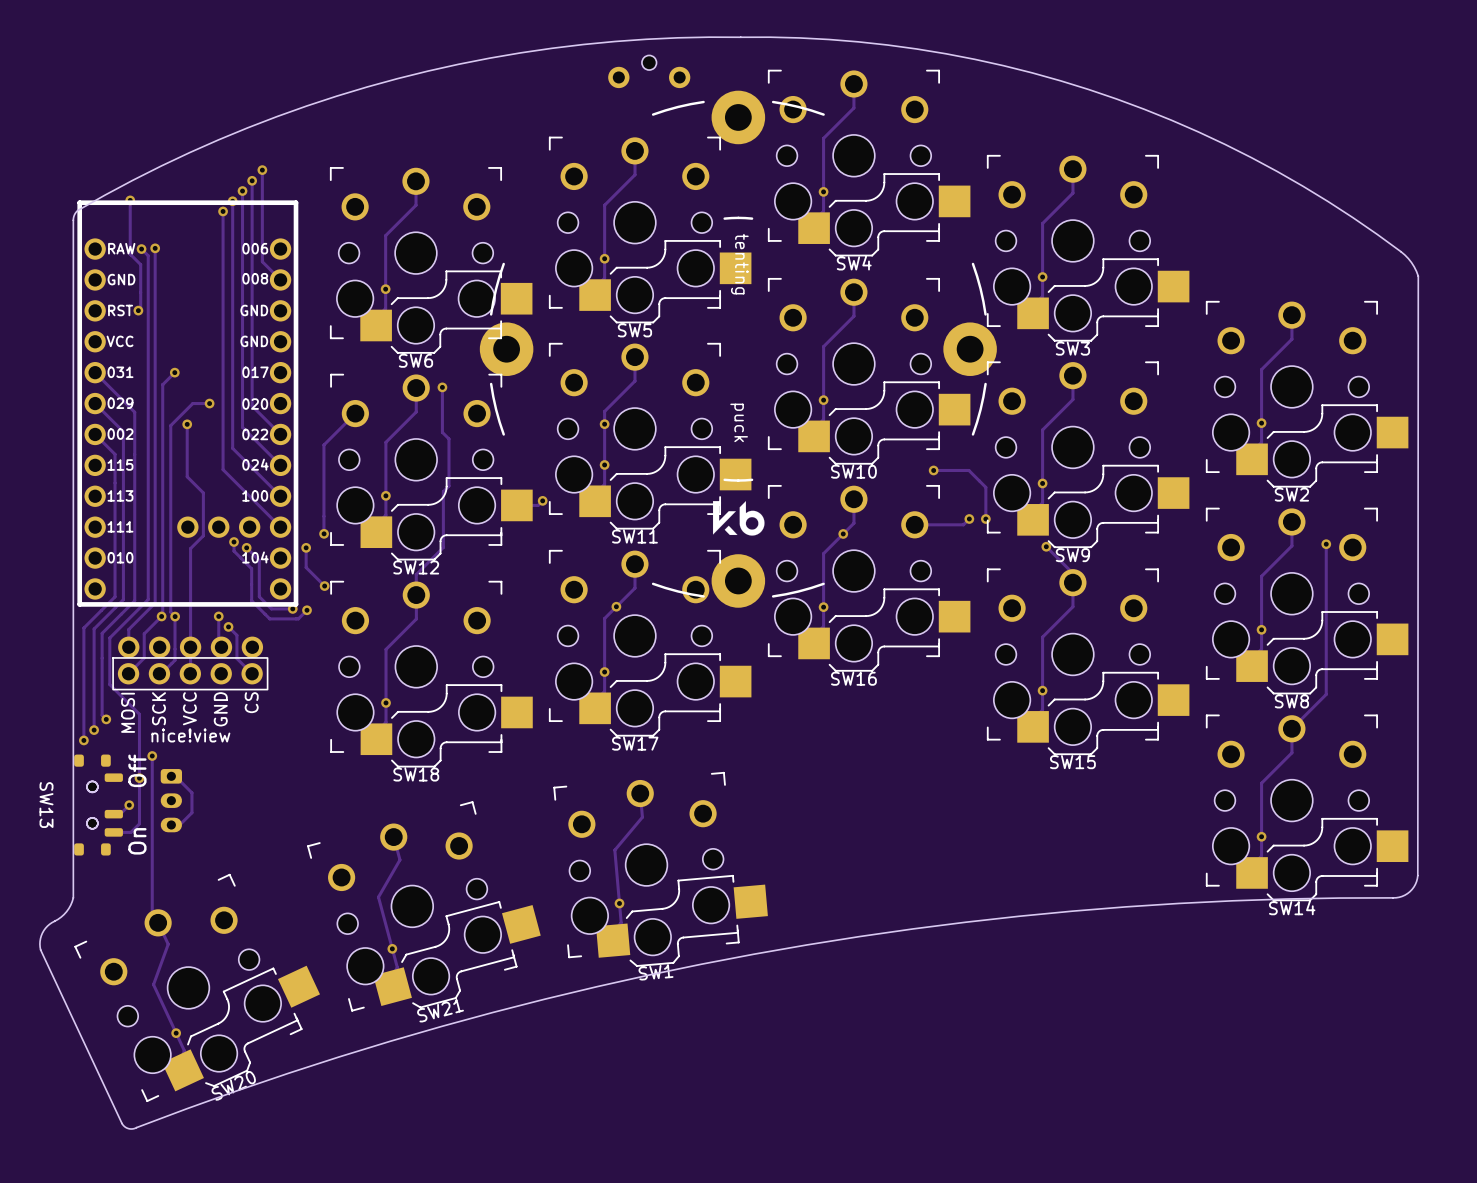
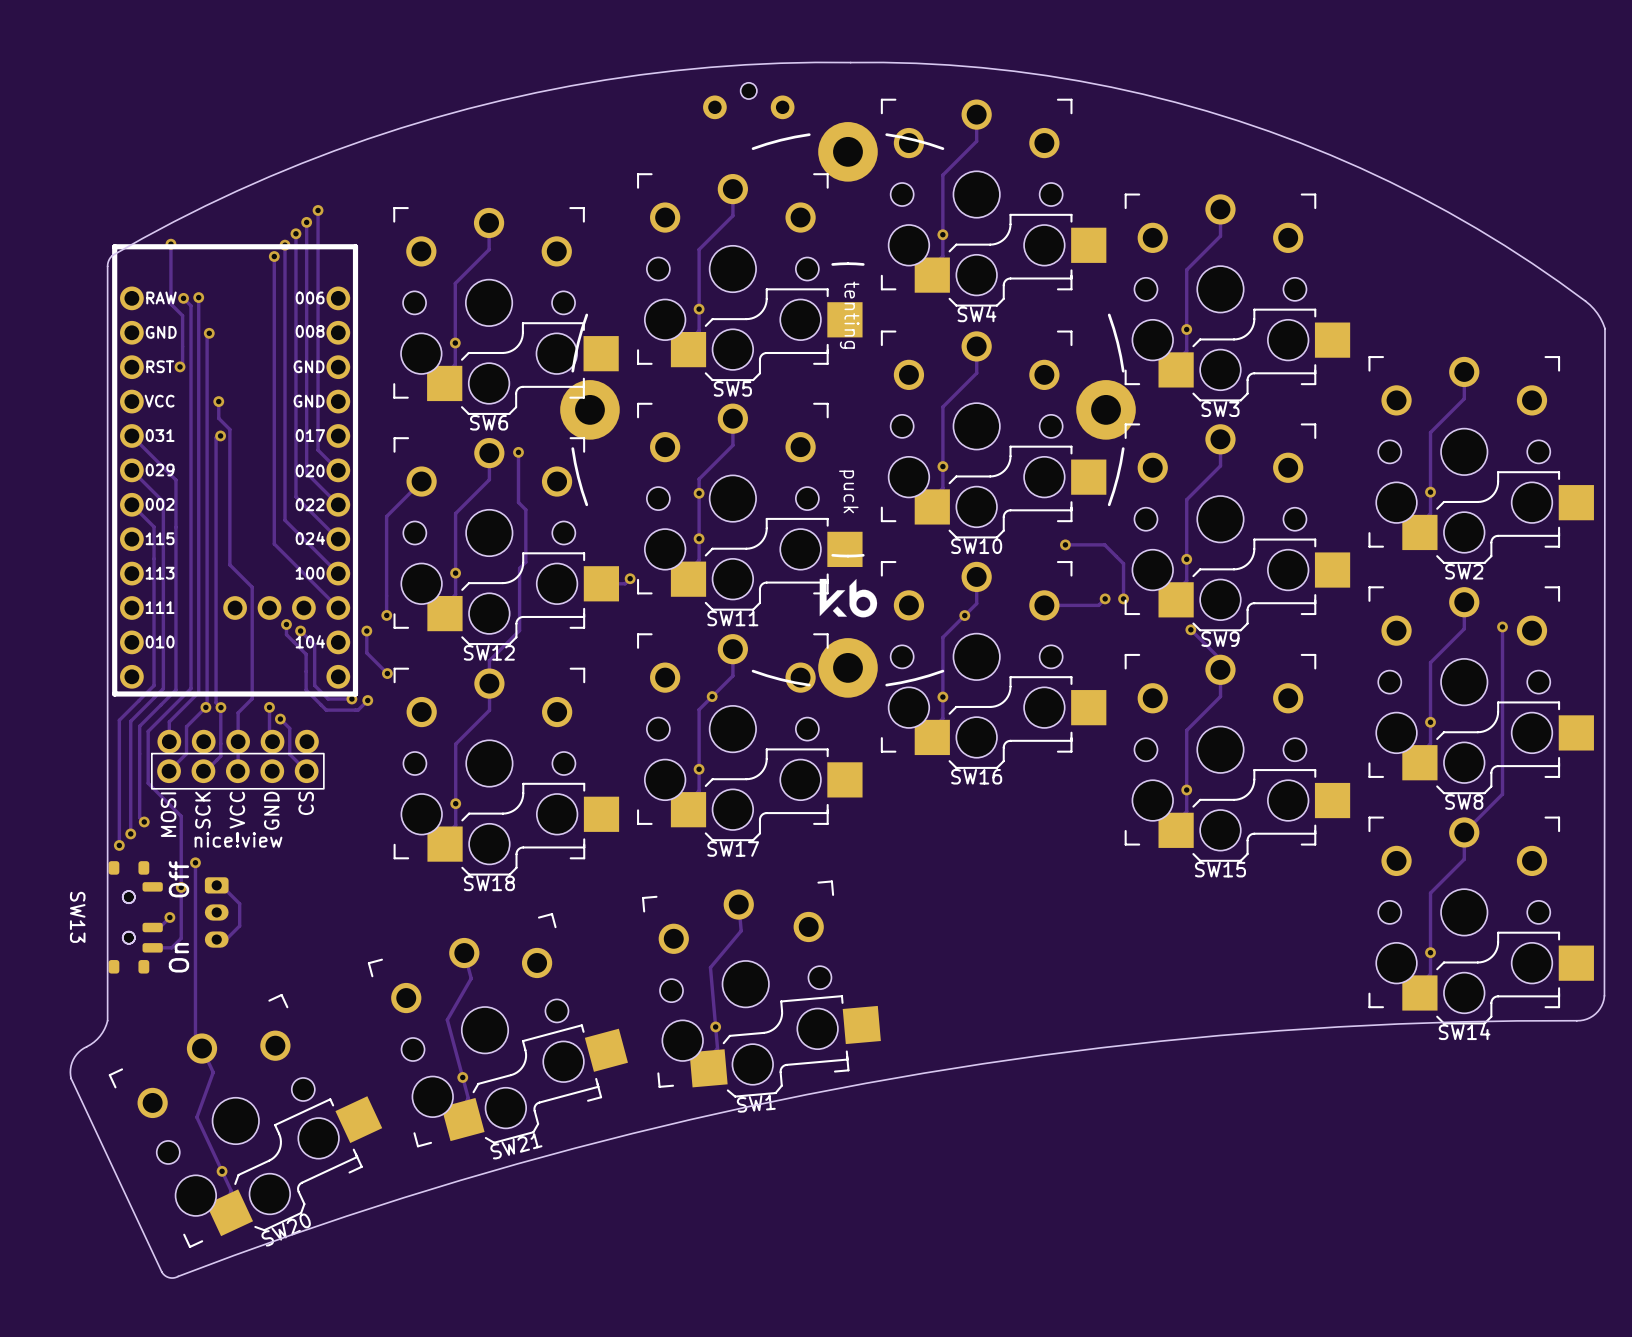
track: (262, 261) (280, 279) -> (318, 312) (318, 450) (338, 470)
via: none -> (209, 333)
via: none -> (218, 401)
track: (174, 372) (162, 384) -> (209, 333) (207, 335) (207, 449)
track: (209, 403) (192, 403) (170, 425) -> (217, 435) (216, 437) (216, 494)
via: (209, 403) -> none
track: (187, 424) (187, 476) (203, 492) (203, 535) (190, 548) (190, 621) -> (218, 401) (218, 418) (229, 429) (229, 564) (252, 587) (252, 698) (238, 712)
via: (187, 424) -> none

